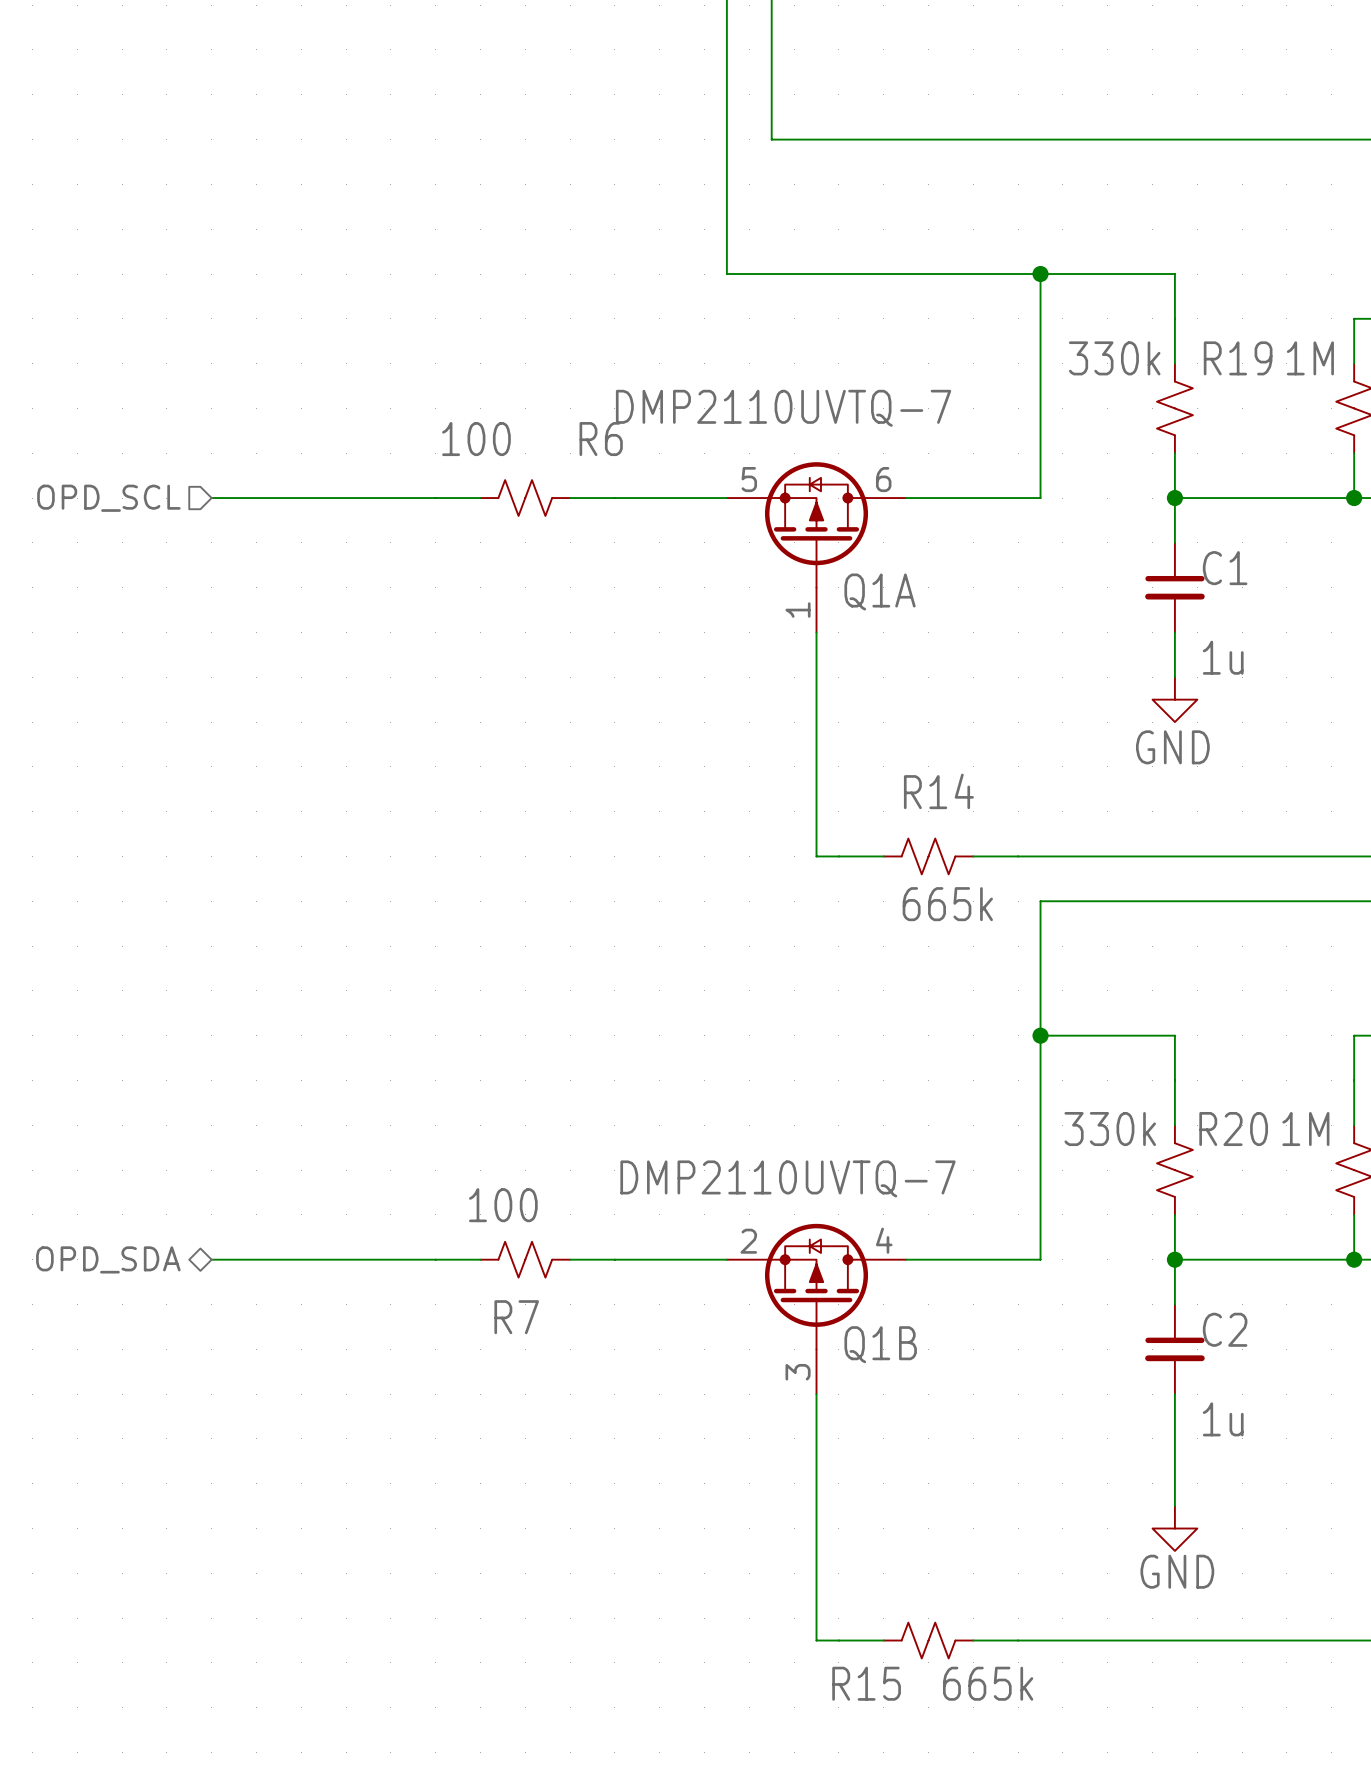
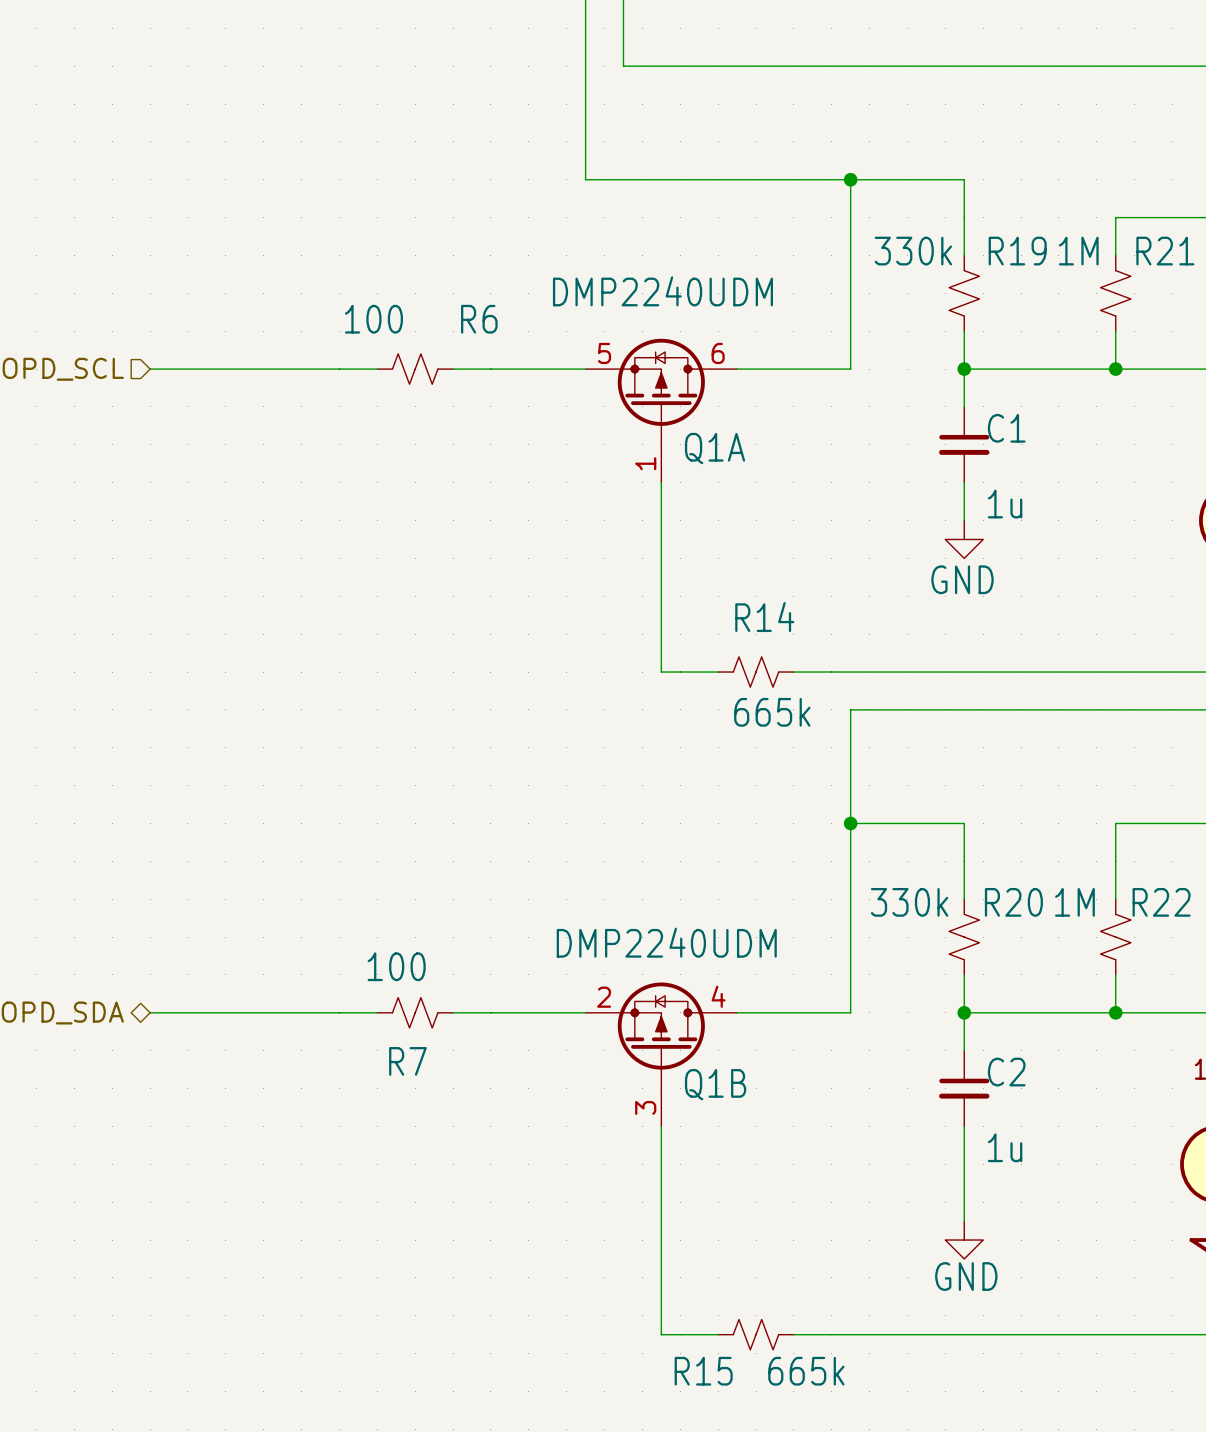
Q1A value: DMP2110UVTQ-7 (783, 408) -> DMP2240UDM (662, 291)
Q1B value: DMP2110UVTQ-7 (788, 1178) -> DMP2240UDM (666, 942)

